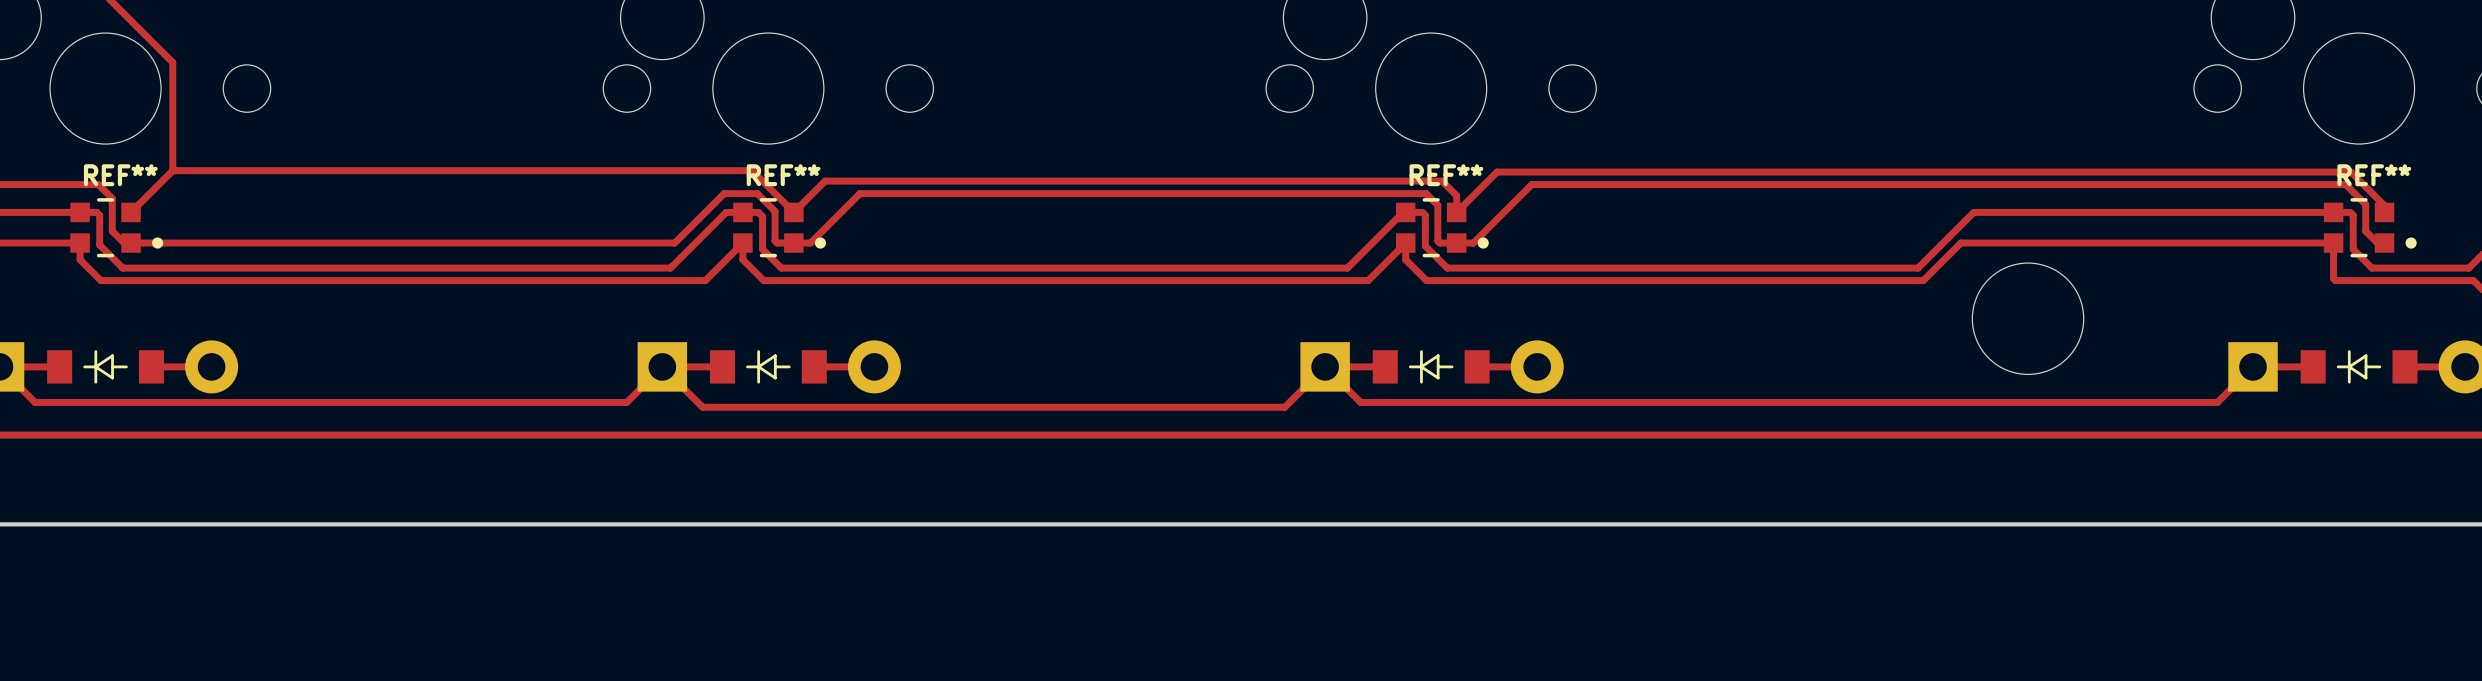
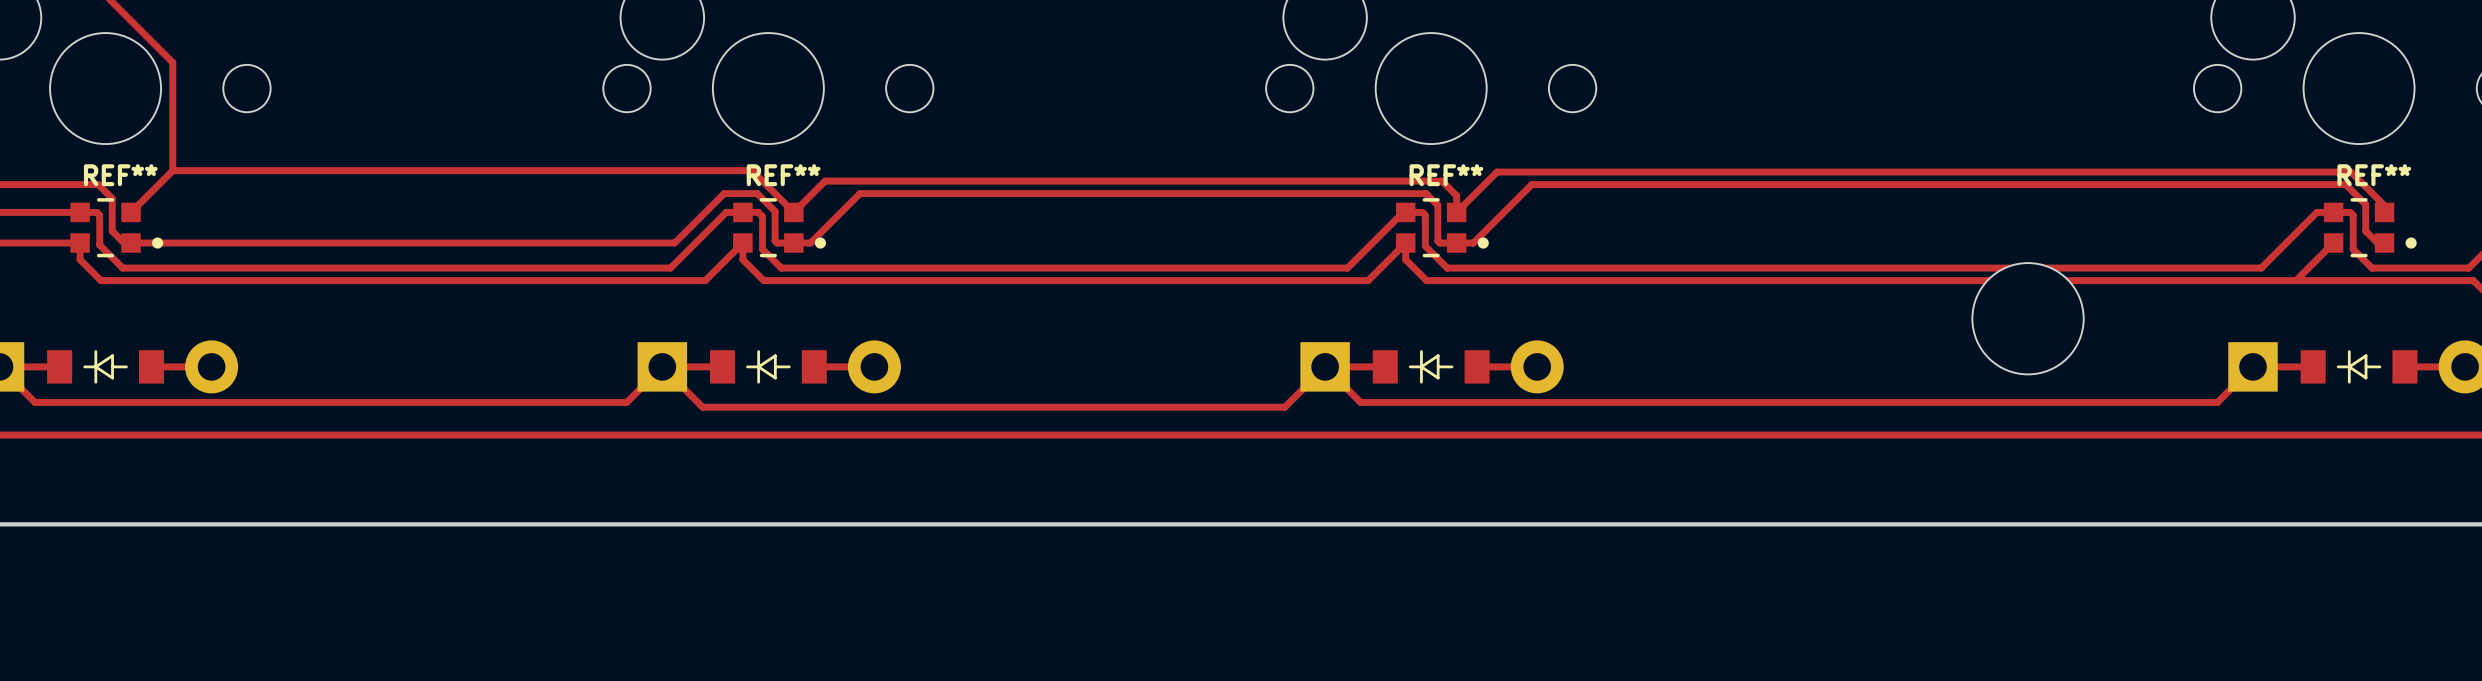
track: (2316, 212) (1973, 212) (1918, 268) -> (2316, 212) (2261, 268) (1918, 268)
track: none -> (2333, 243) (2296, 280)
track: (1923, 280) (1960, 243) (2333, 243) (2333, 278) (2335, 280) -> (1923, 280) (2335, 280)

